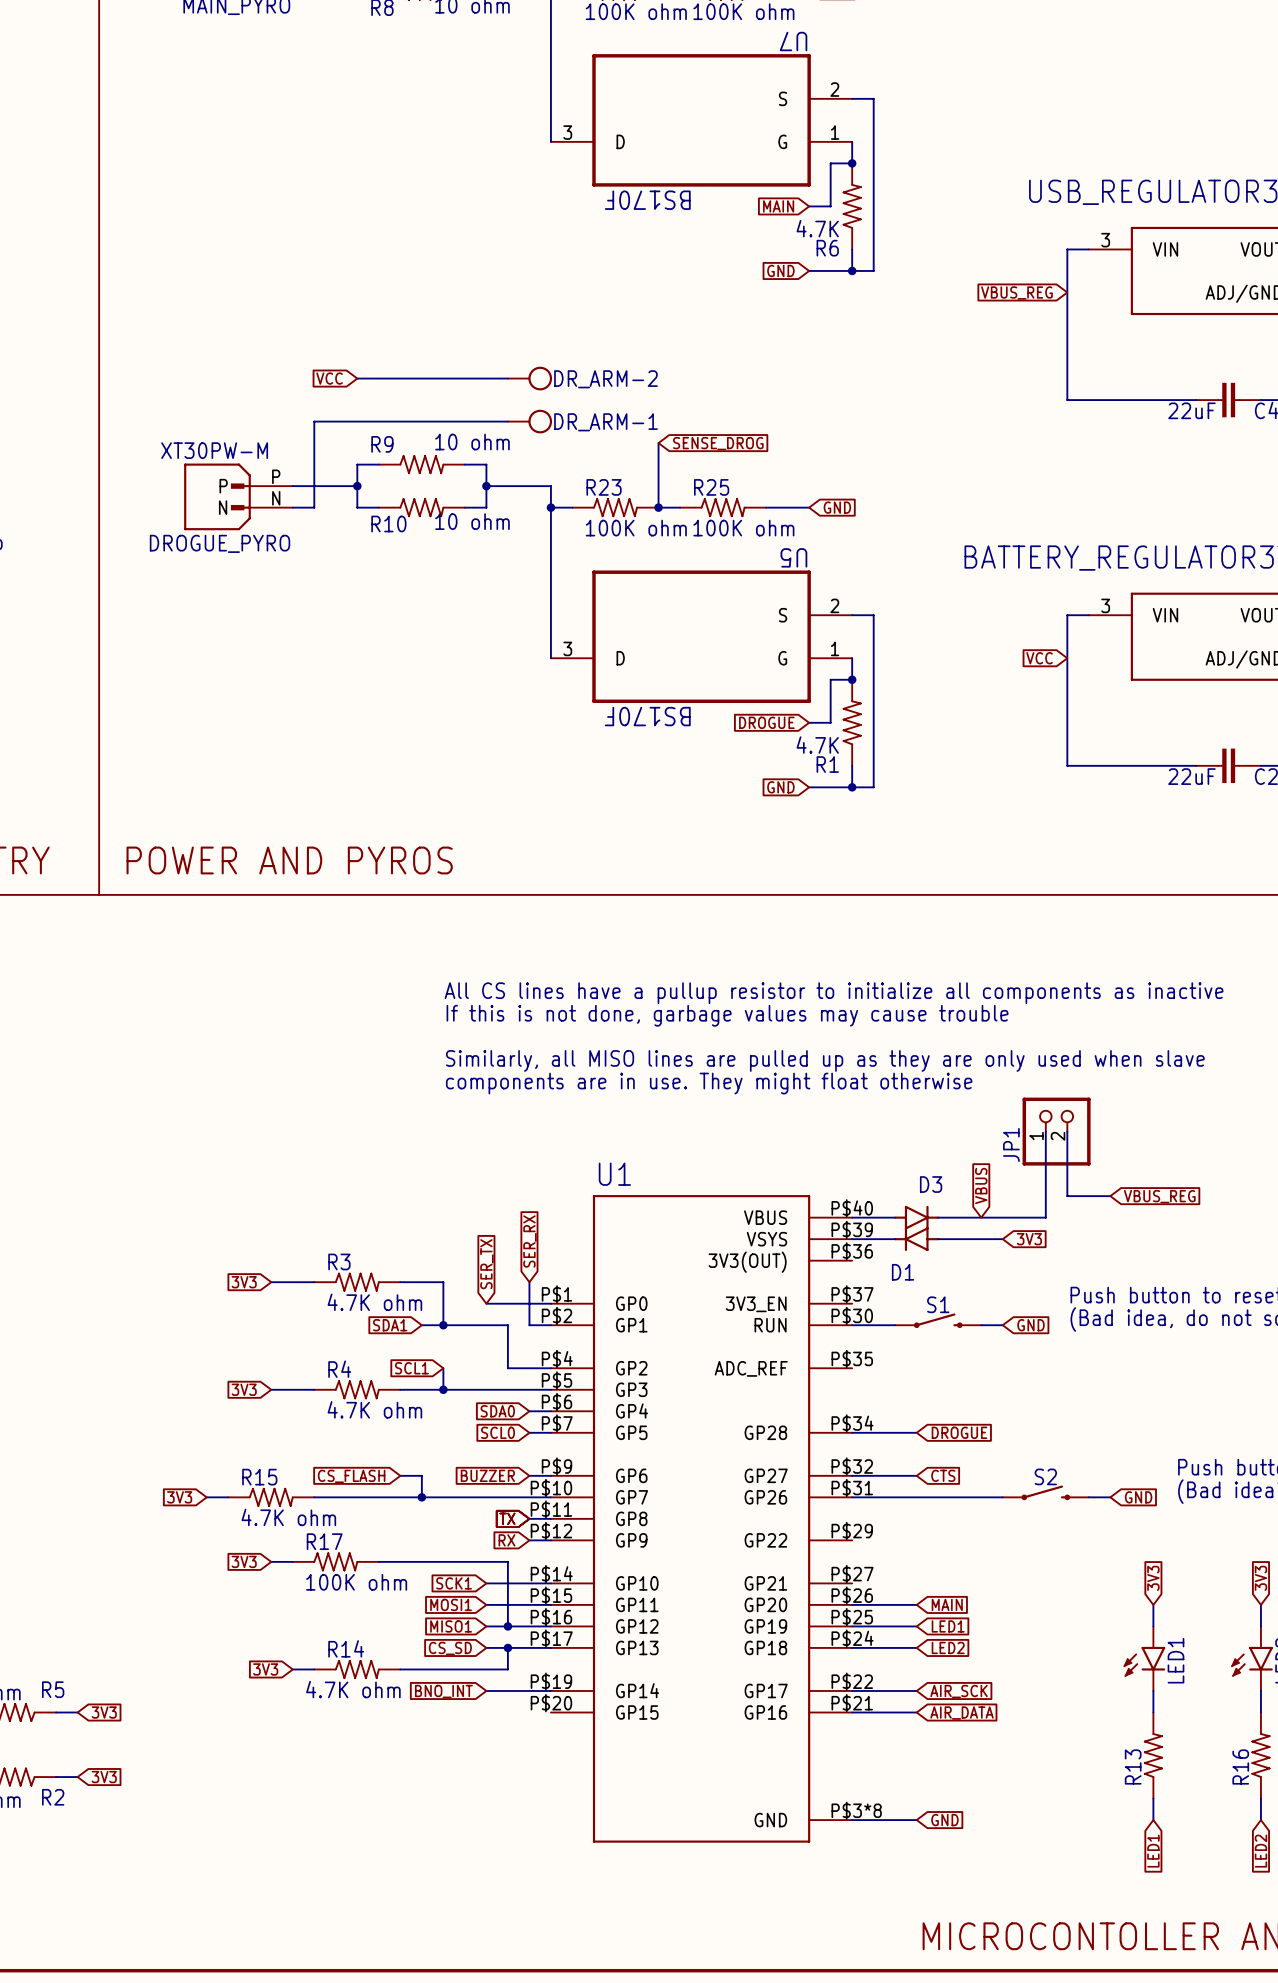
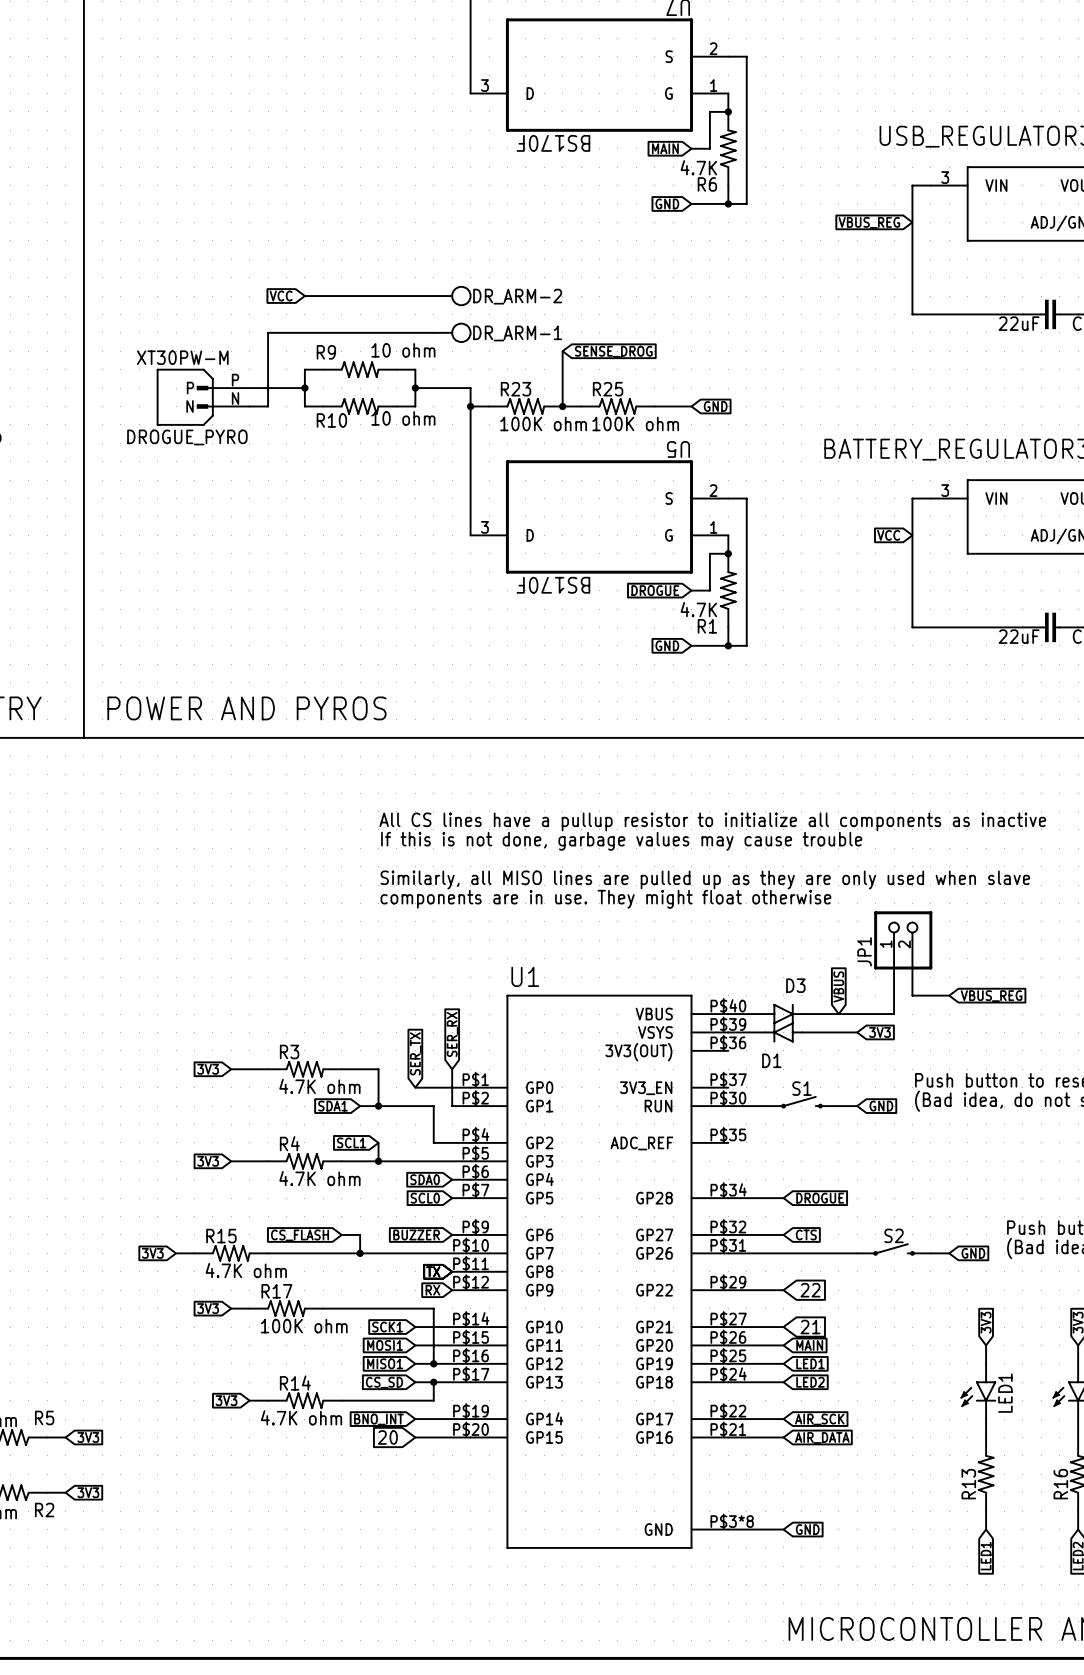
wire: none -> (728, 1290) (783, 1290)
global label: none -> 22 (810, 1290)
wire: none -> (728, 1327) (783, 1327)
global label: none -> 21 (810, 1327)
global label: none -> 20 (387, 1437)
wire: none -> (415, 1437) (470, 1437)

